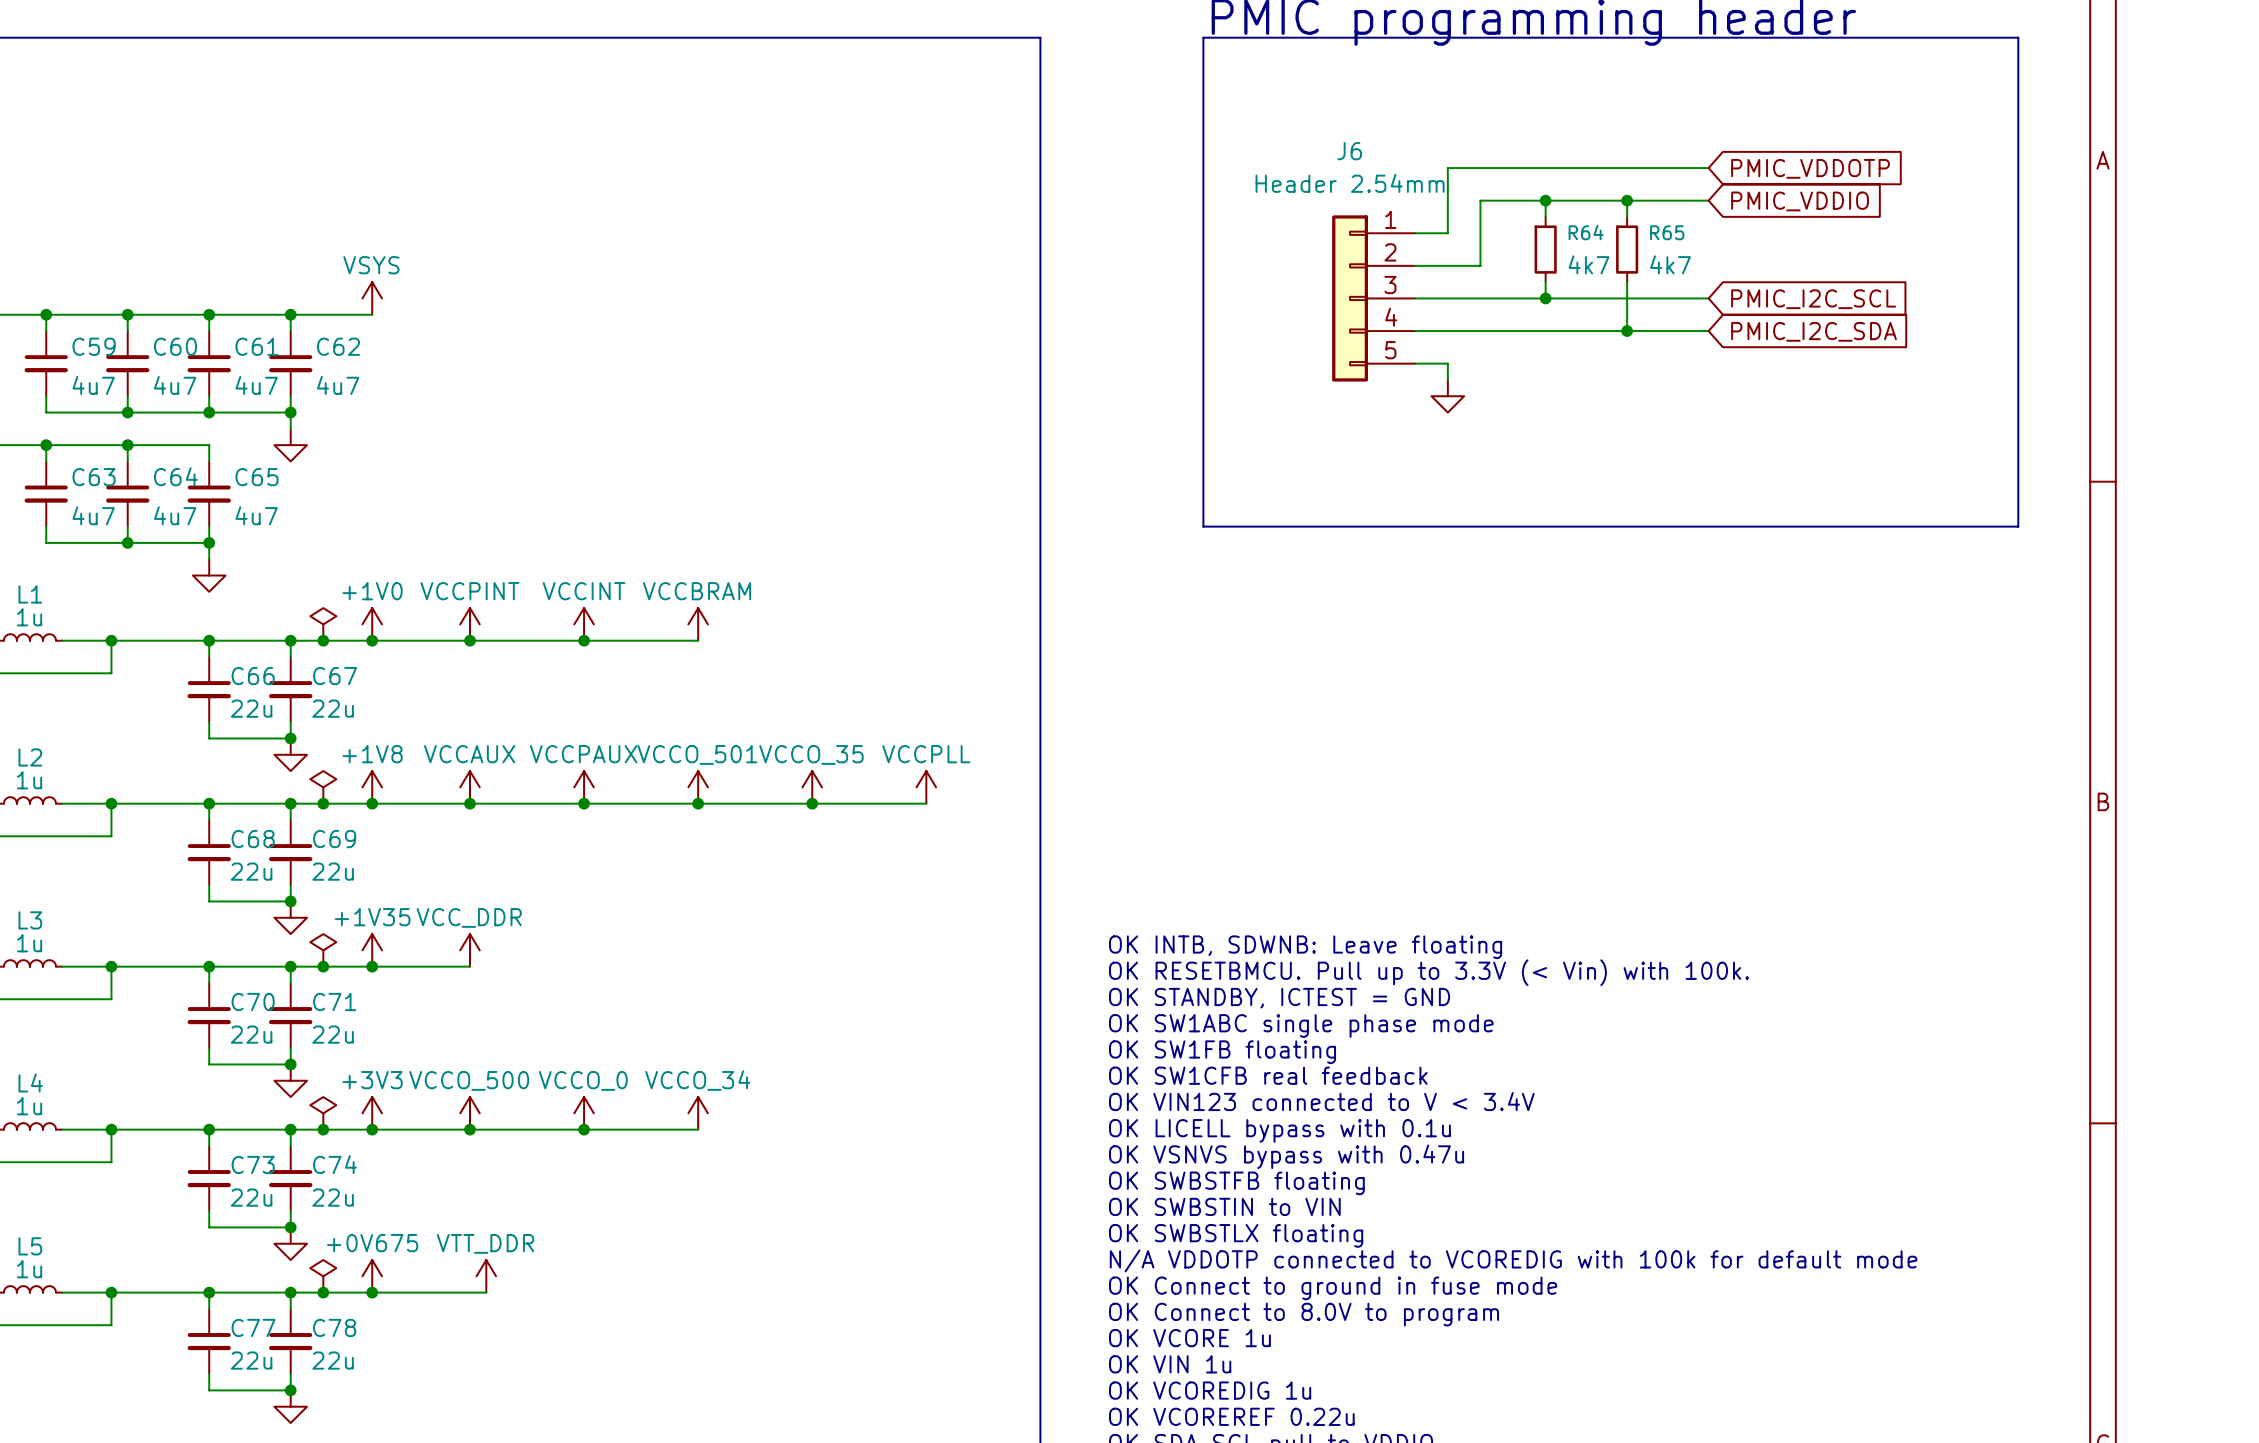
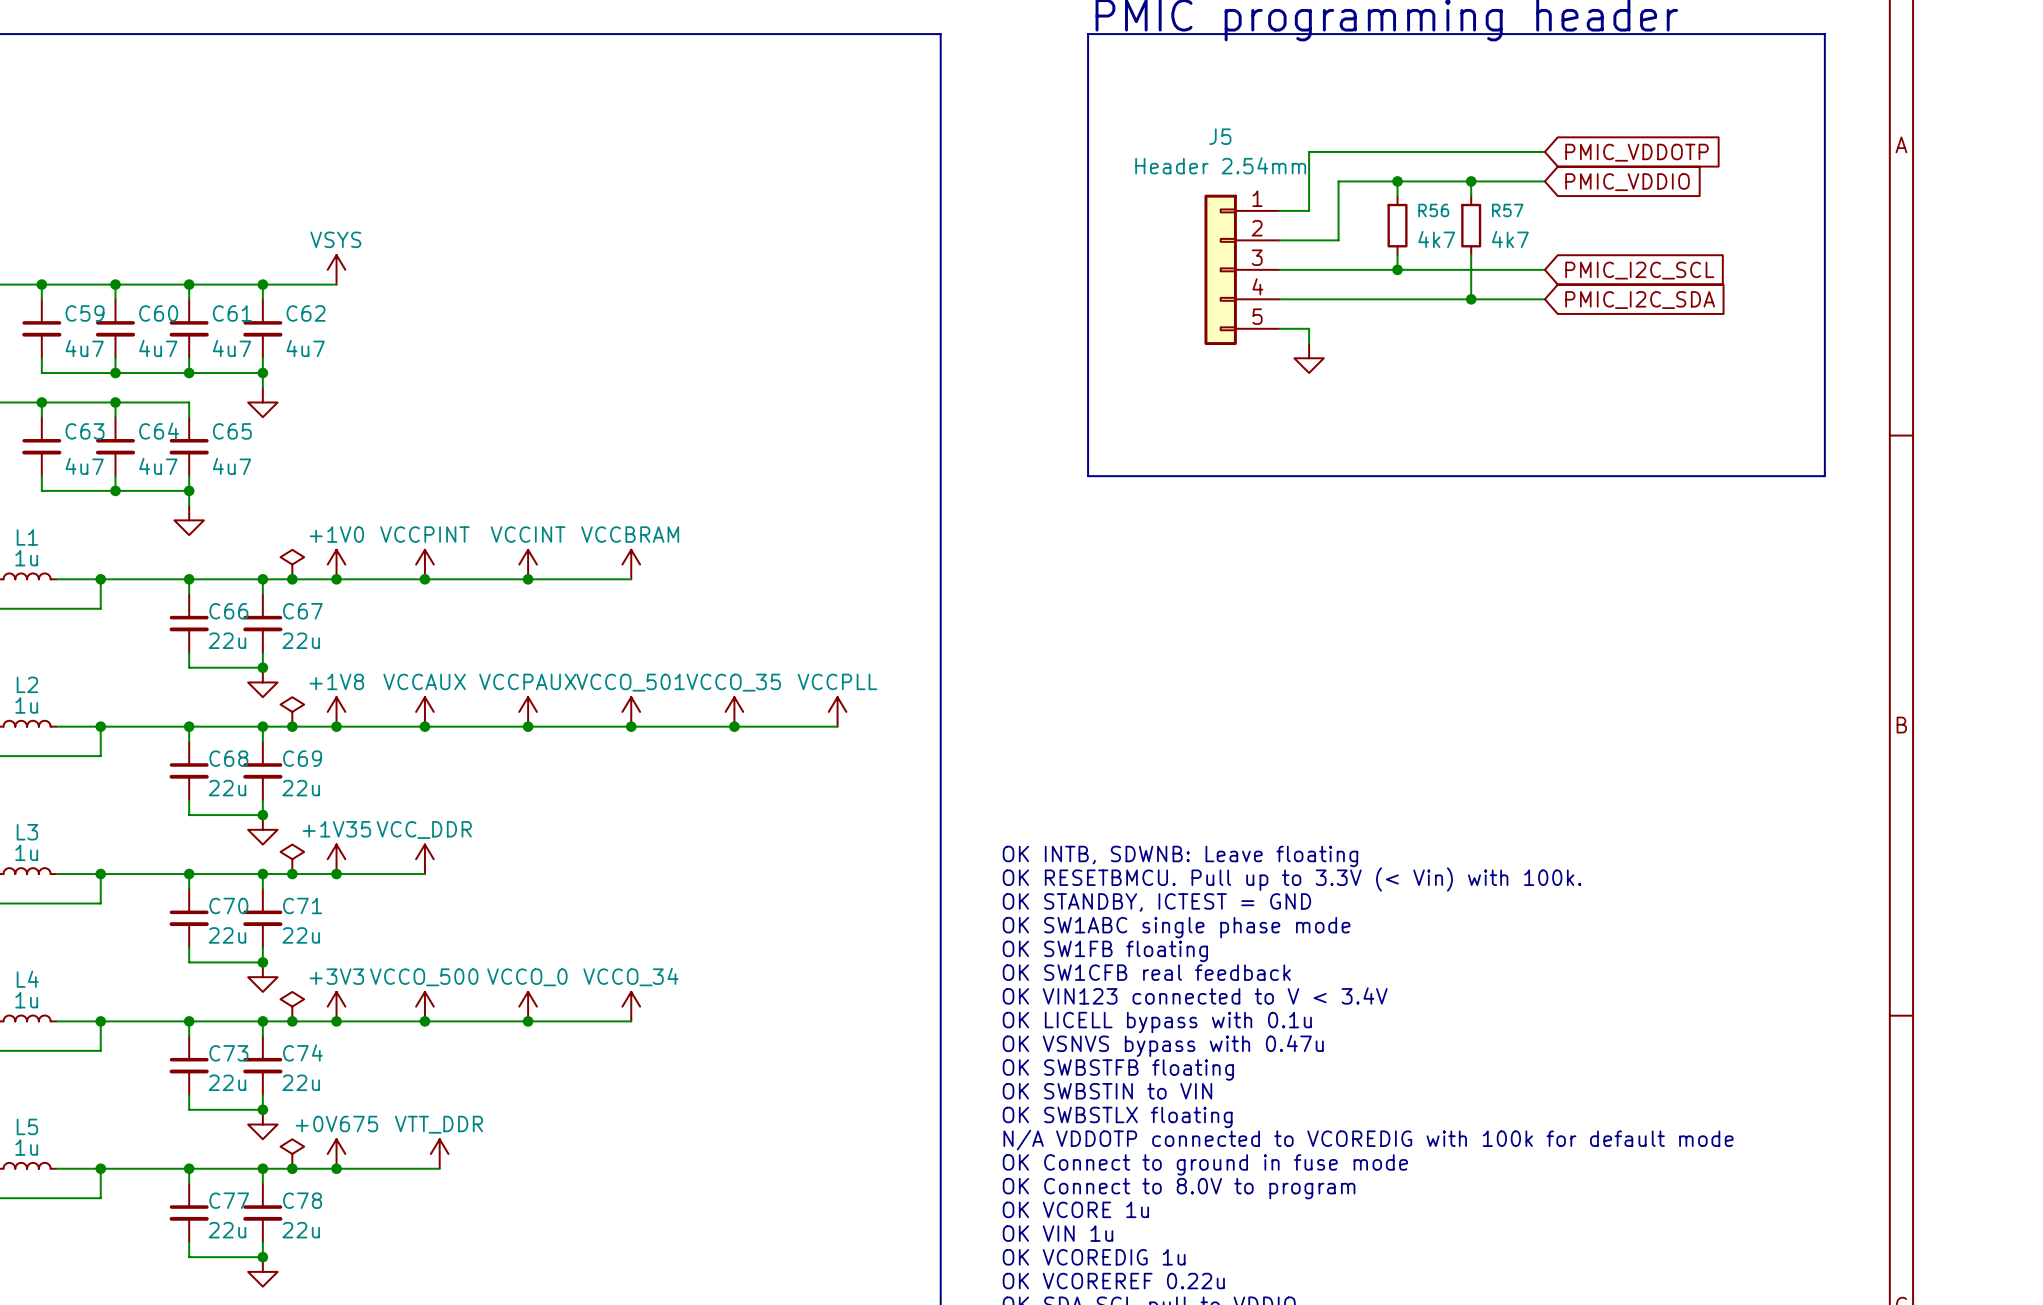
J6 name: J6 (1349, 151) -> J5 (1220, 136)
R64 name: R64 (1586, 232) -> R56 (1433, 210)
R65 name: R65 (1667, 232) -> R57 (1507, 210)

